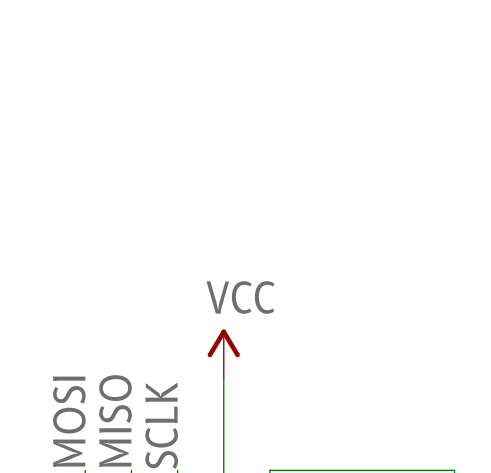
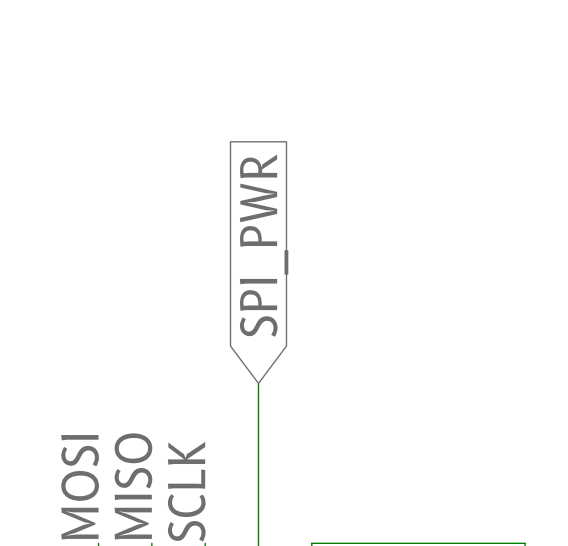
global label: none -> SPI_PWR (264, 245)
power symbol: VCC (223, 353) -> none

